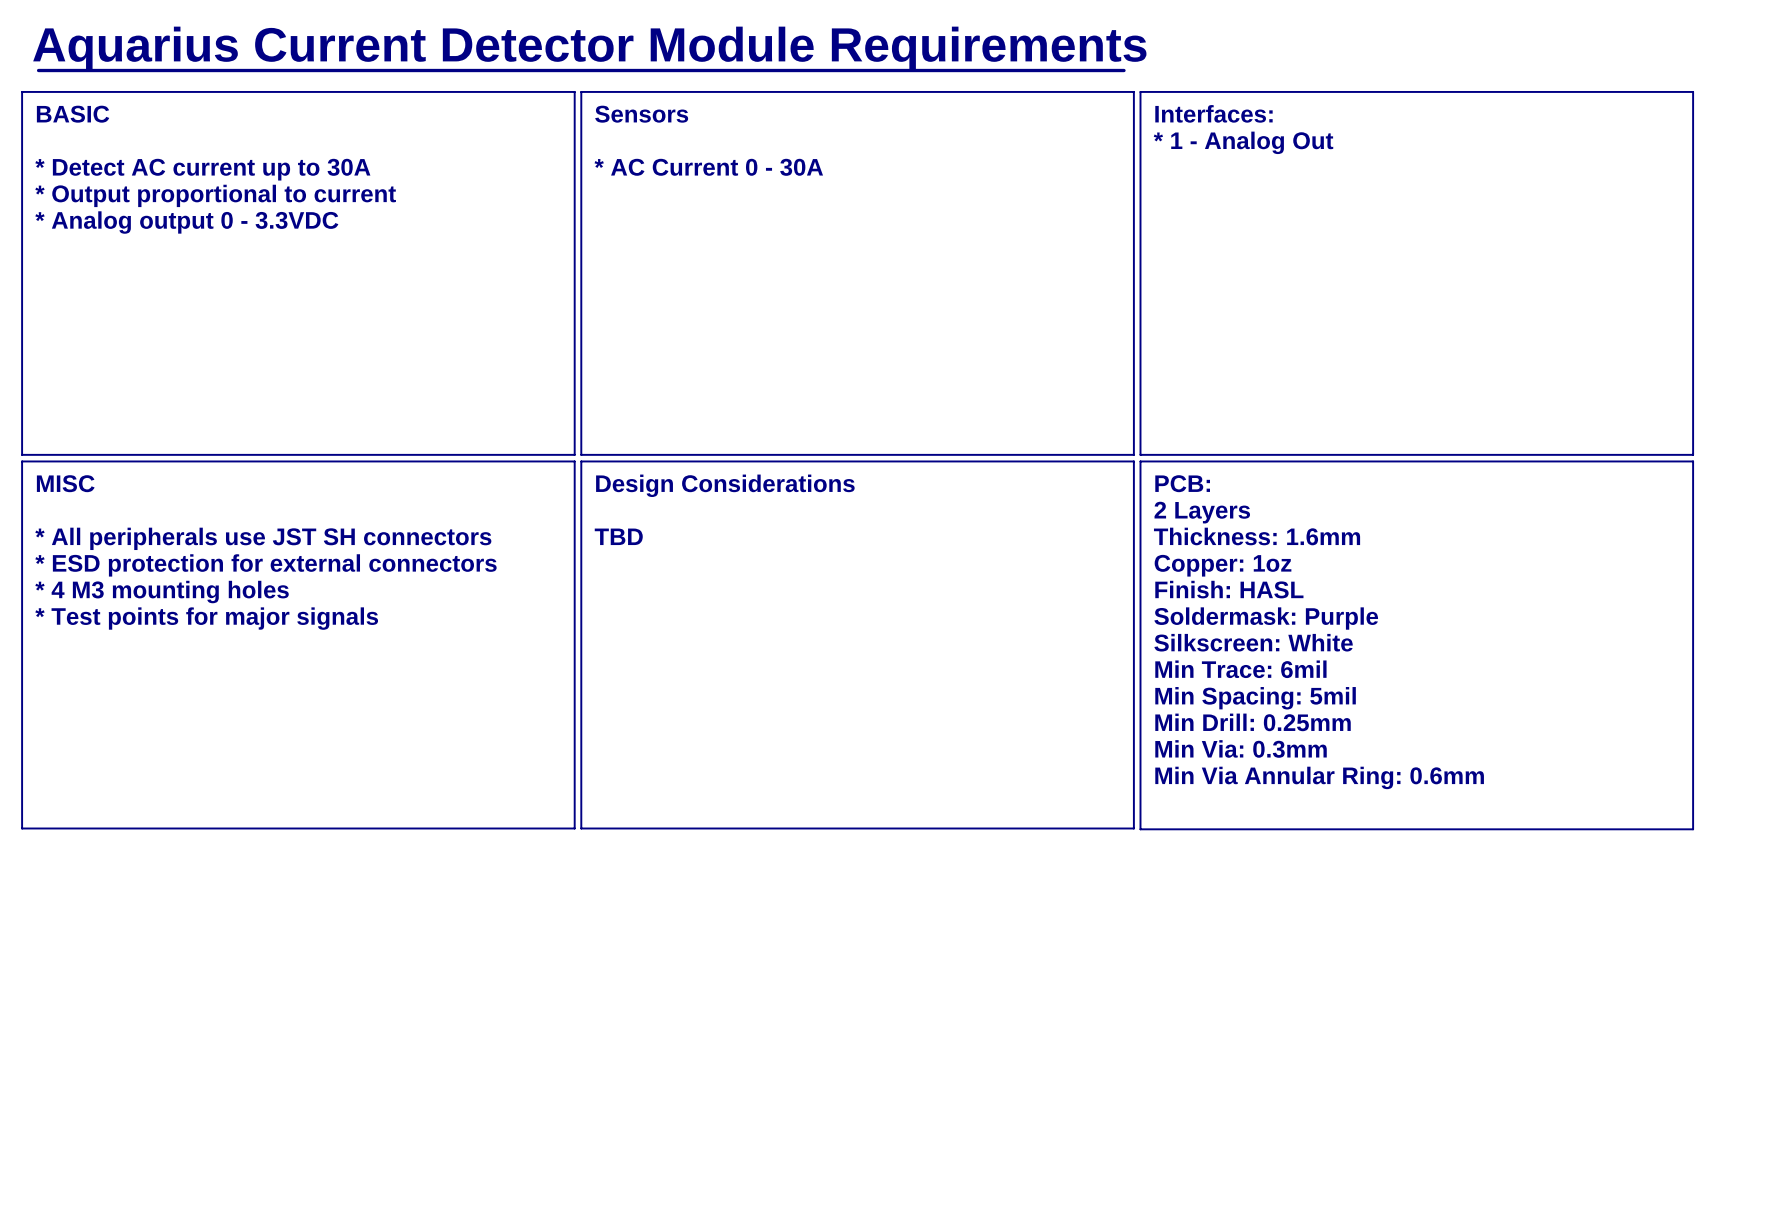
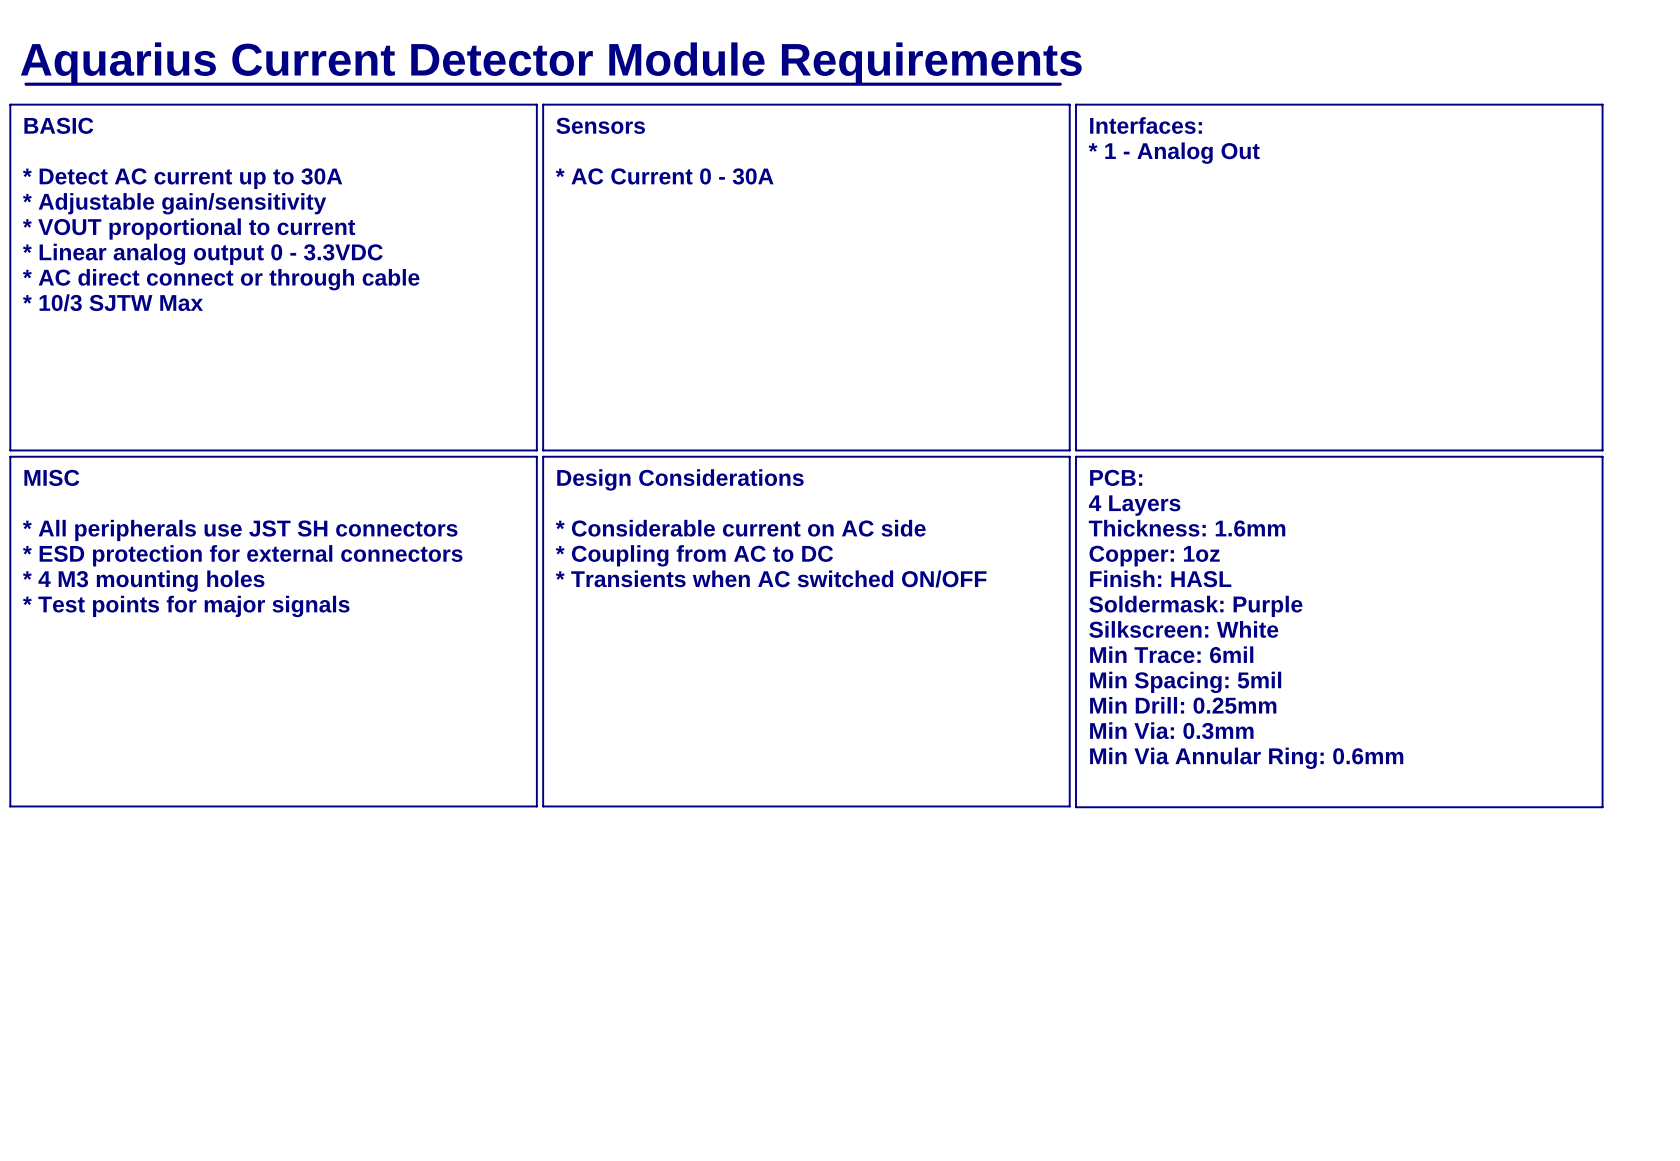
text: * Output proportional to current (215, 195) -> * Adjustable gain/sensitivity (174, 203)
text: * Analog output 0 - 3.3VDC (186, 222) -> * VOUT proportional to current (189, 229)
text: none -> * Linear analog output 0 - 3.3VDC (202, 254)
text: none -> * AC direct connect or through cable (221, 279)
text: none -> * 10/3 SJTW Max (112, 302)
text: 2 Layers (1202, 512) -> 4 Layers (1134, 505)
text: TBD (618, 536) -> * Considerable current on AC side (740, 528)
text: none -> * Coupling from AC to DC (694, 555)
text: none -> * Transients when AC switched ON/OFF (771, 578)

